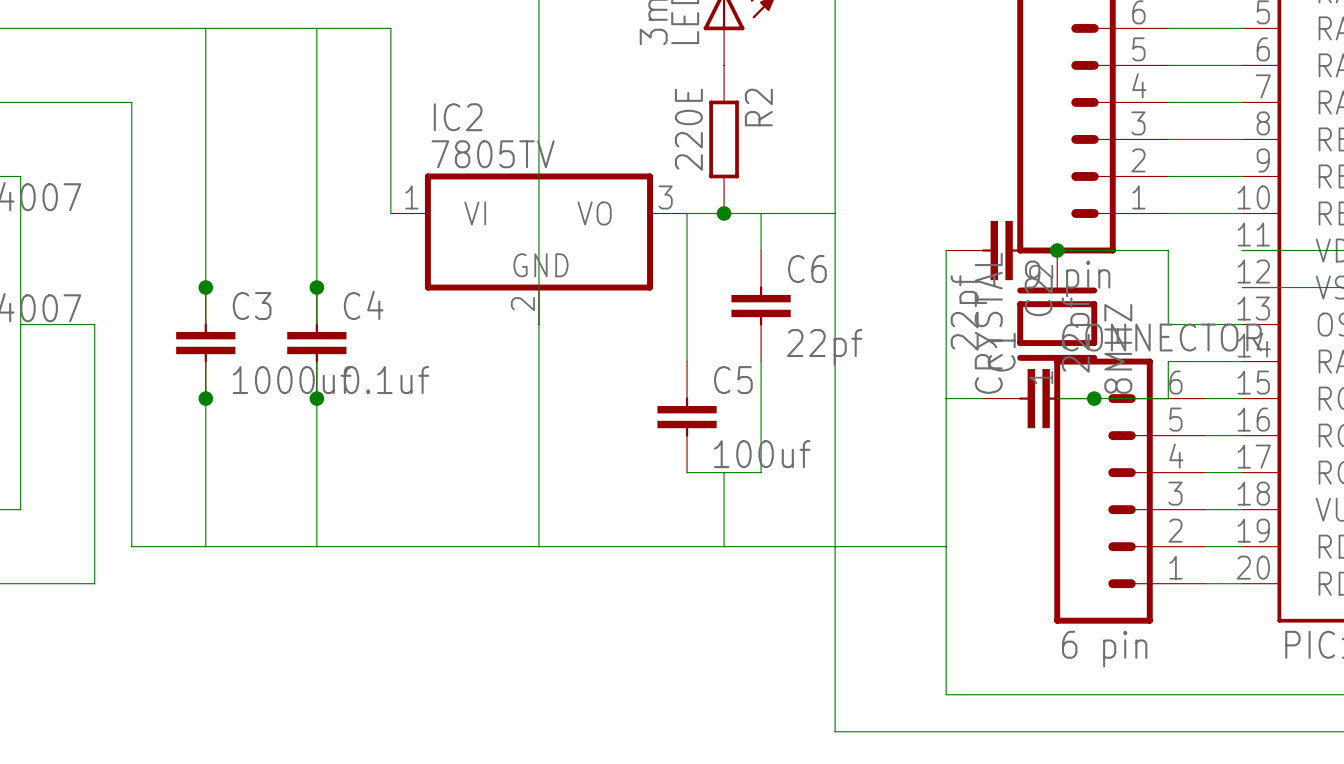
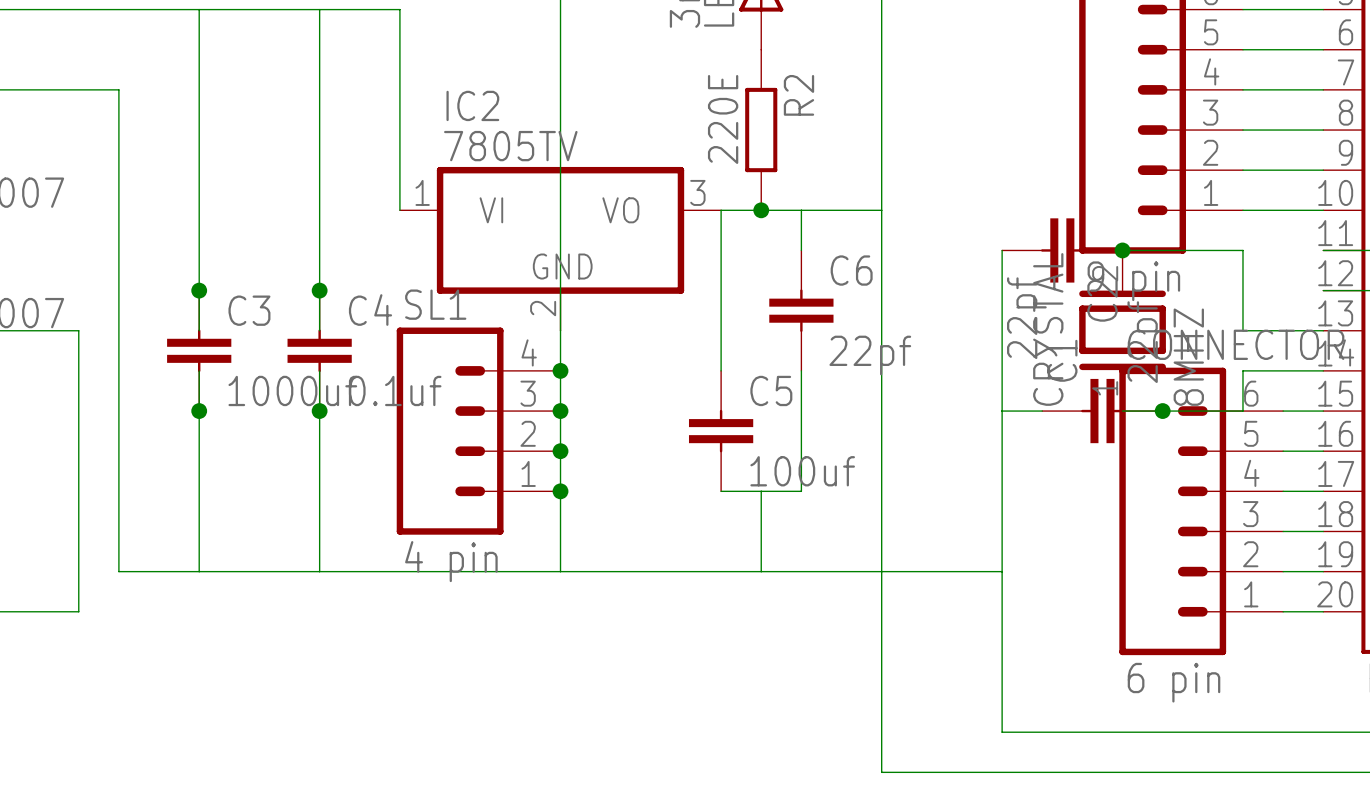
junction: none -> (560, 370)
junction: none -> (560, 411)
SL1: none -> 4 pin (478, 431)
junction: none -> (560, 451)
junction: none -> (560, 491)

